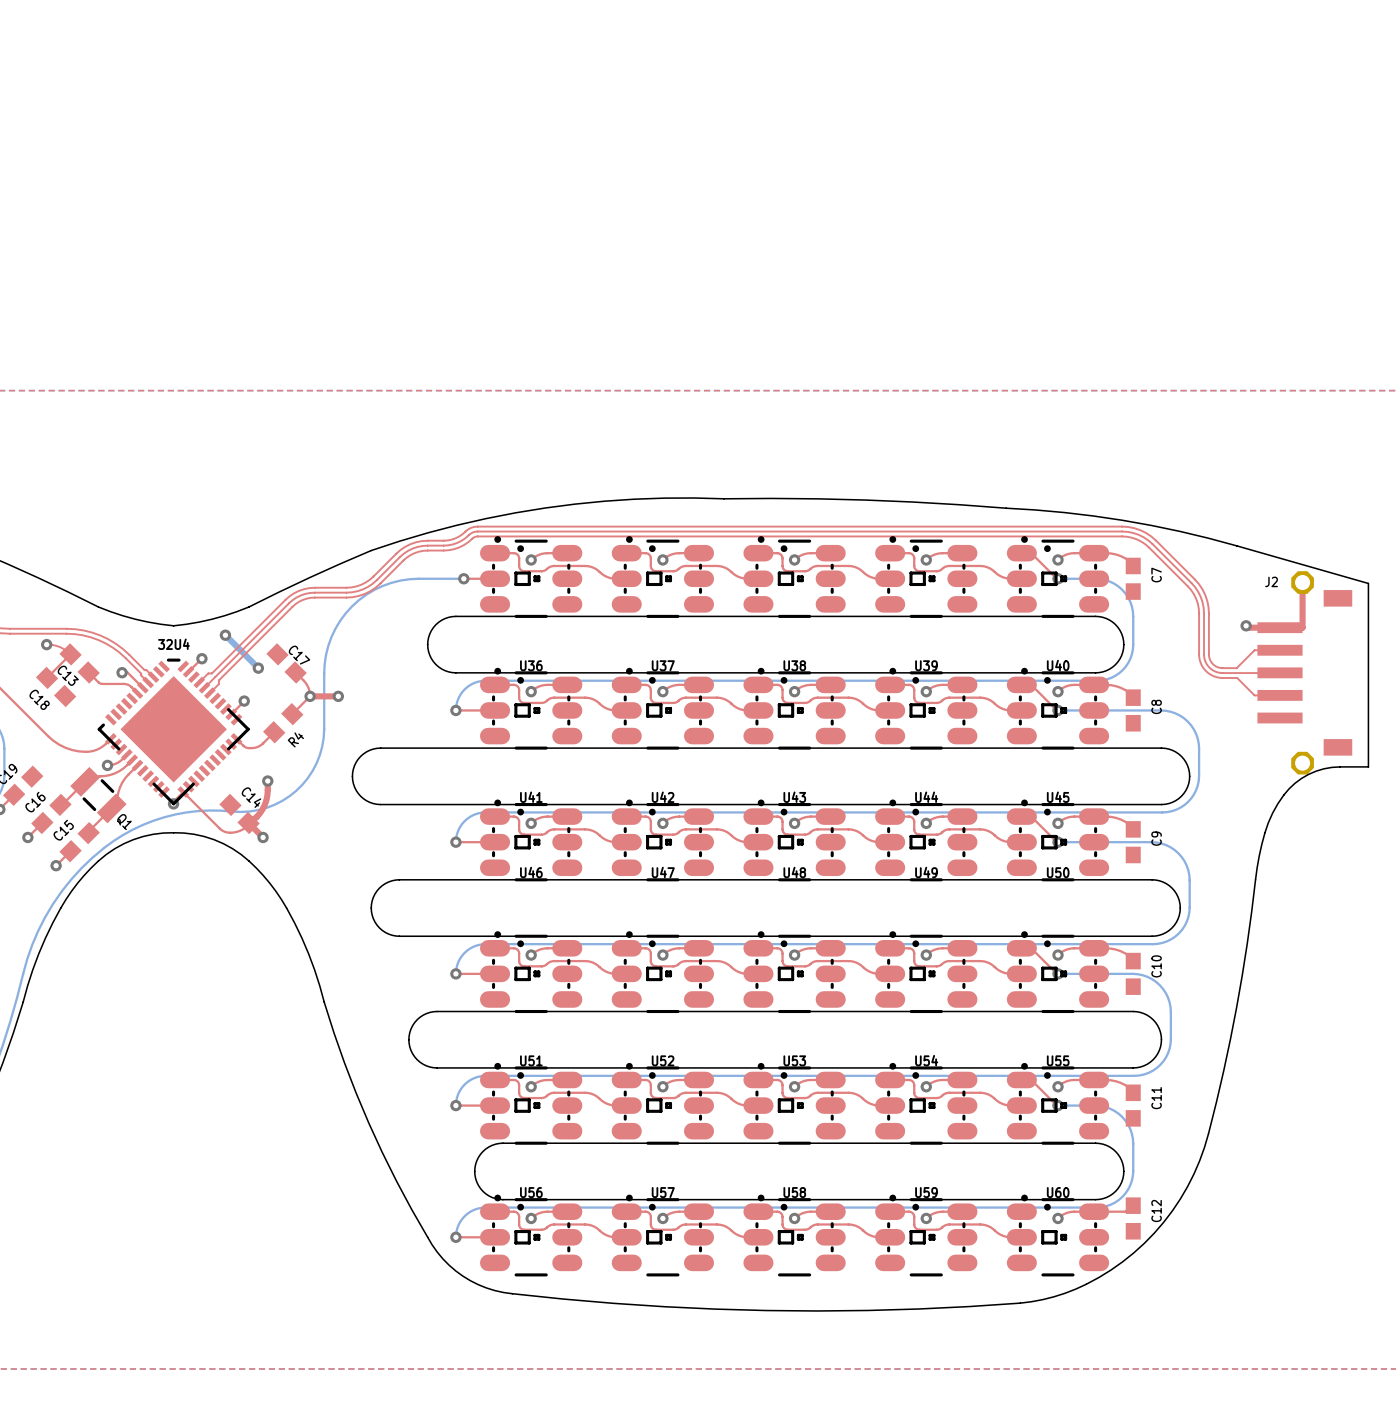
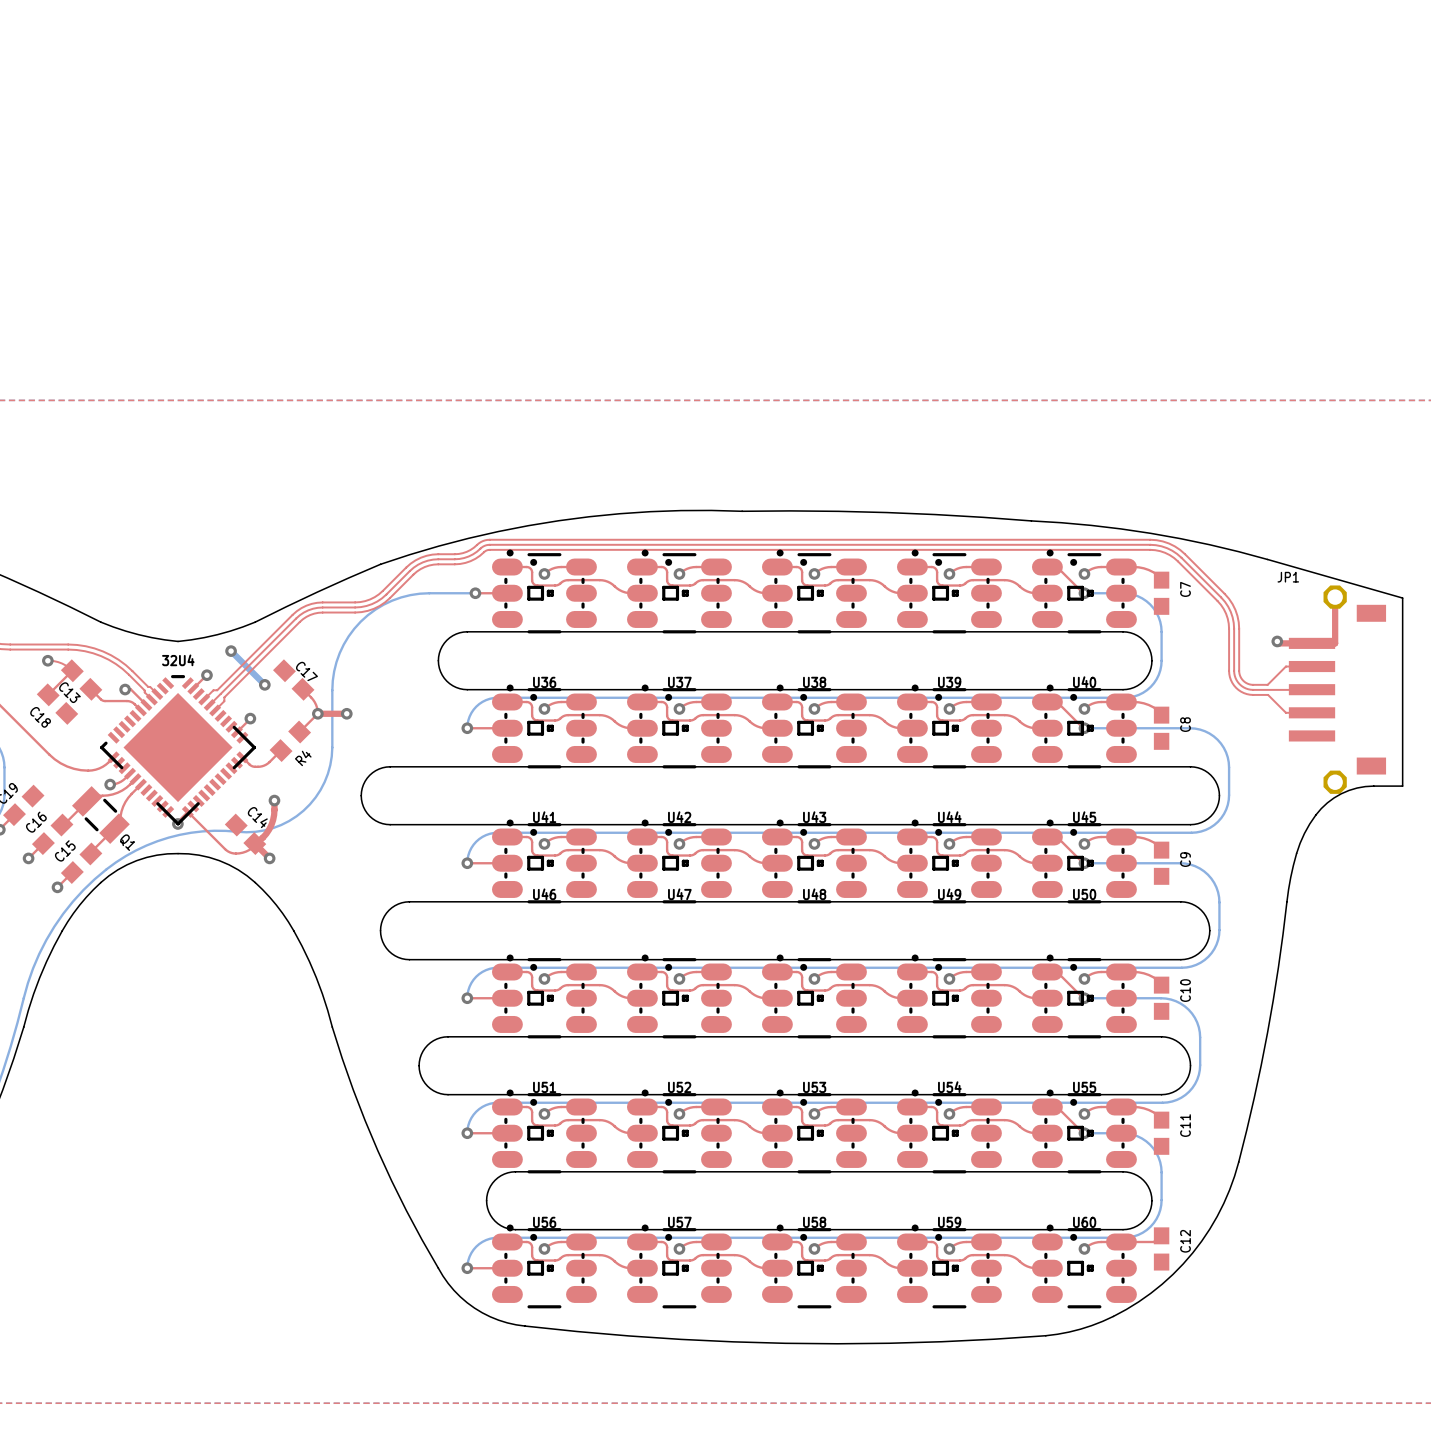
J2 name: J2 (1271, 581) -> JP1 (1288, 577)

